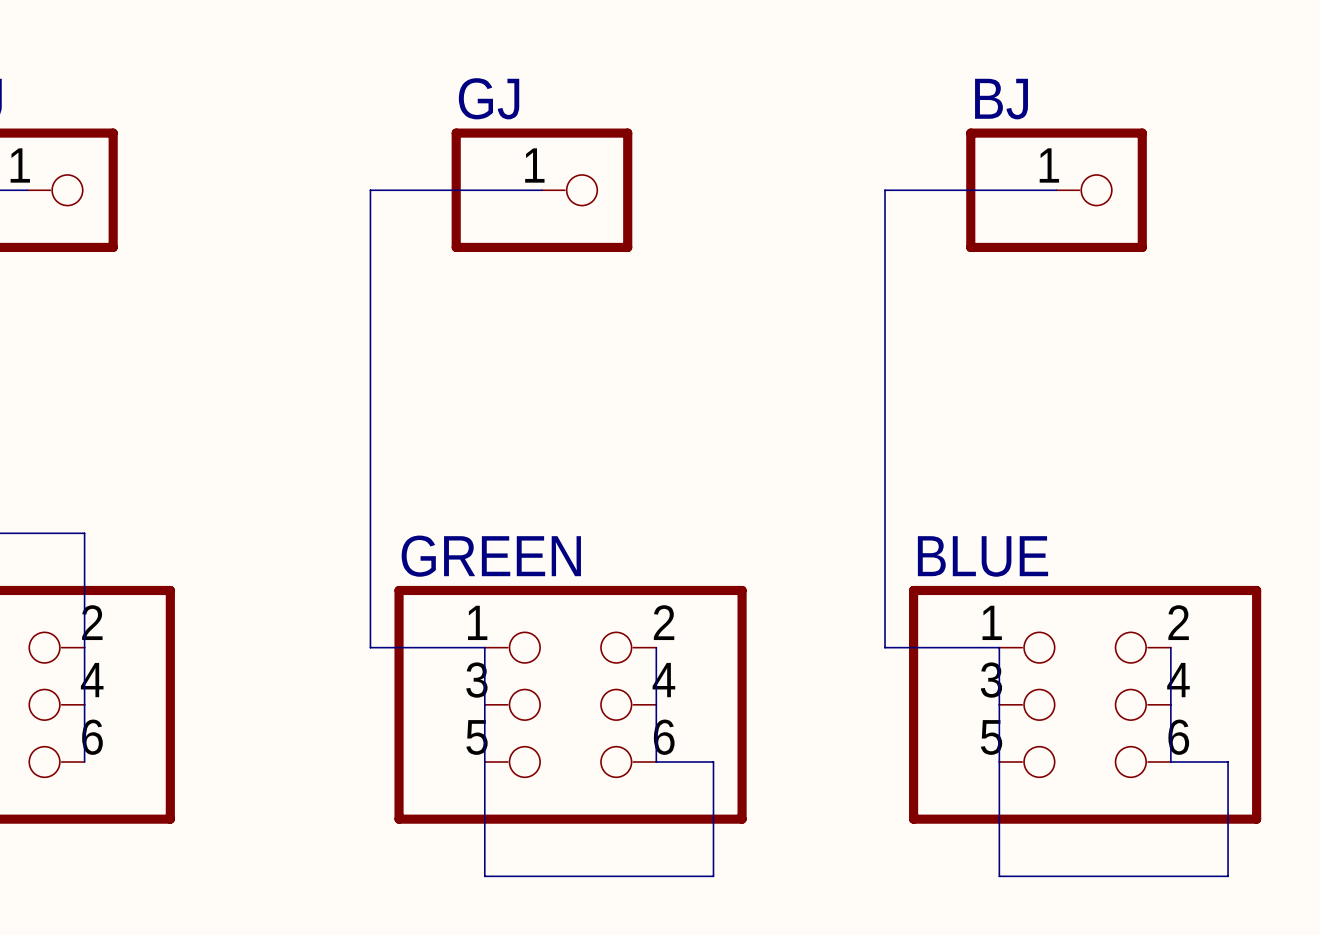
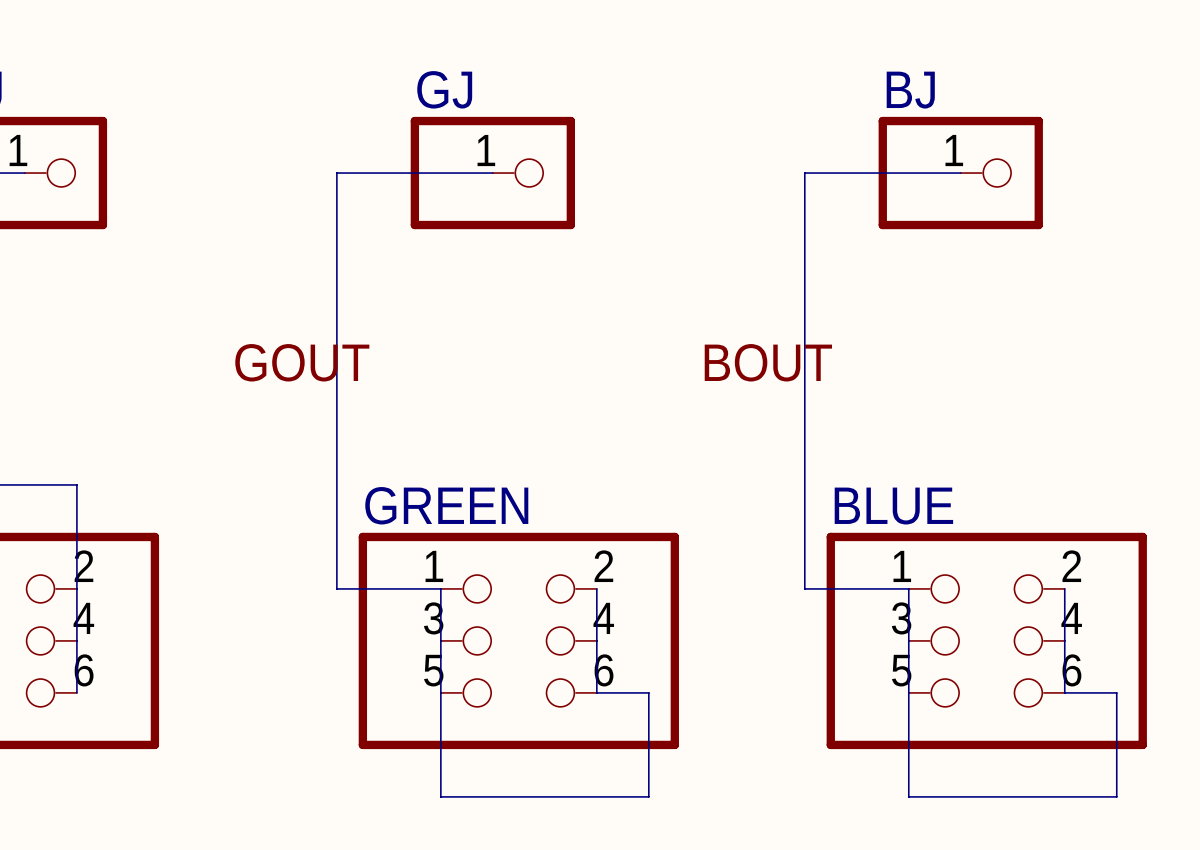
label: none -> GOUT (302, 362)
label: none -> BOUT (768, 362)

